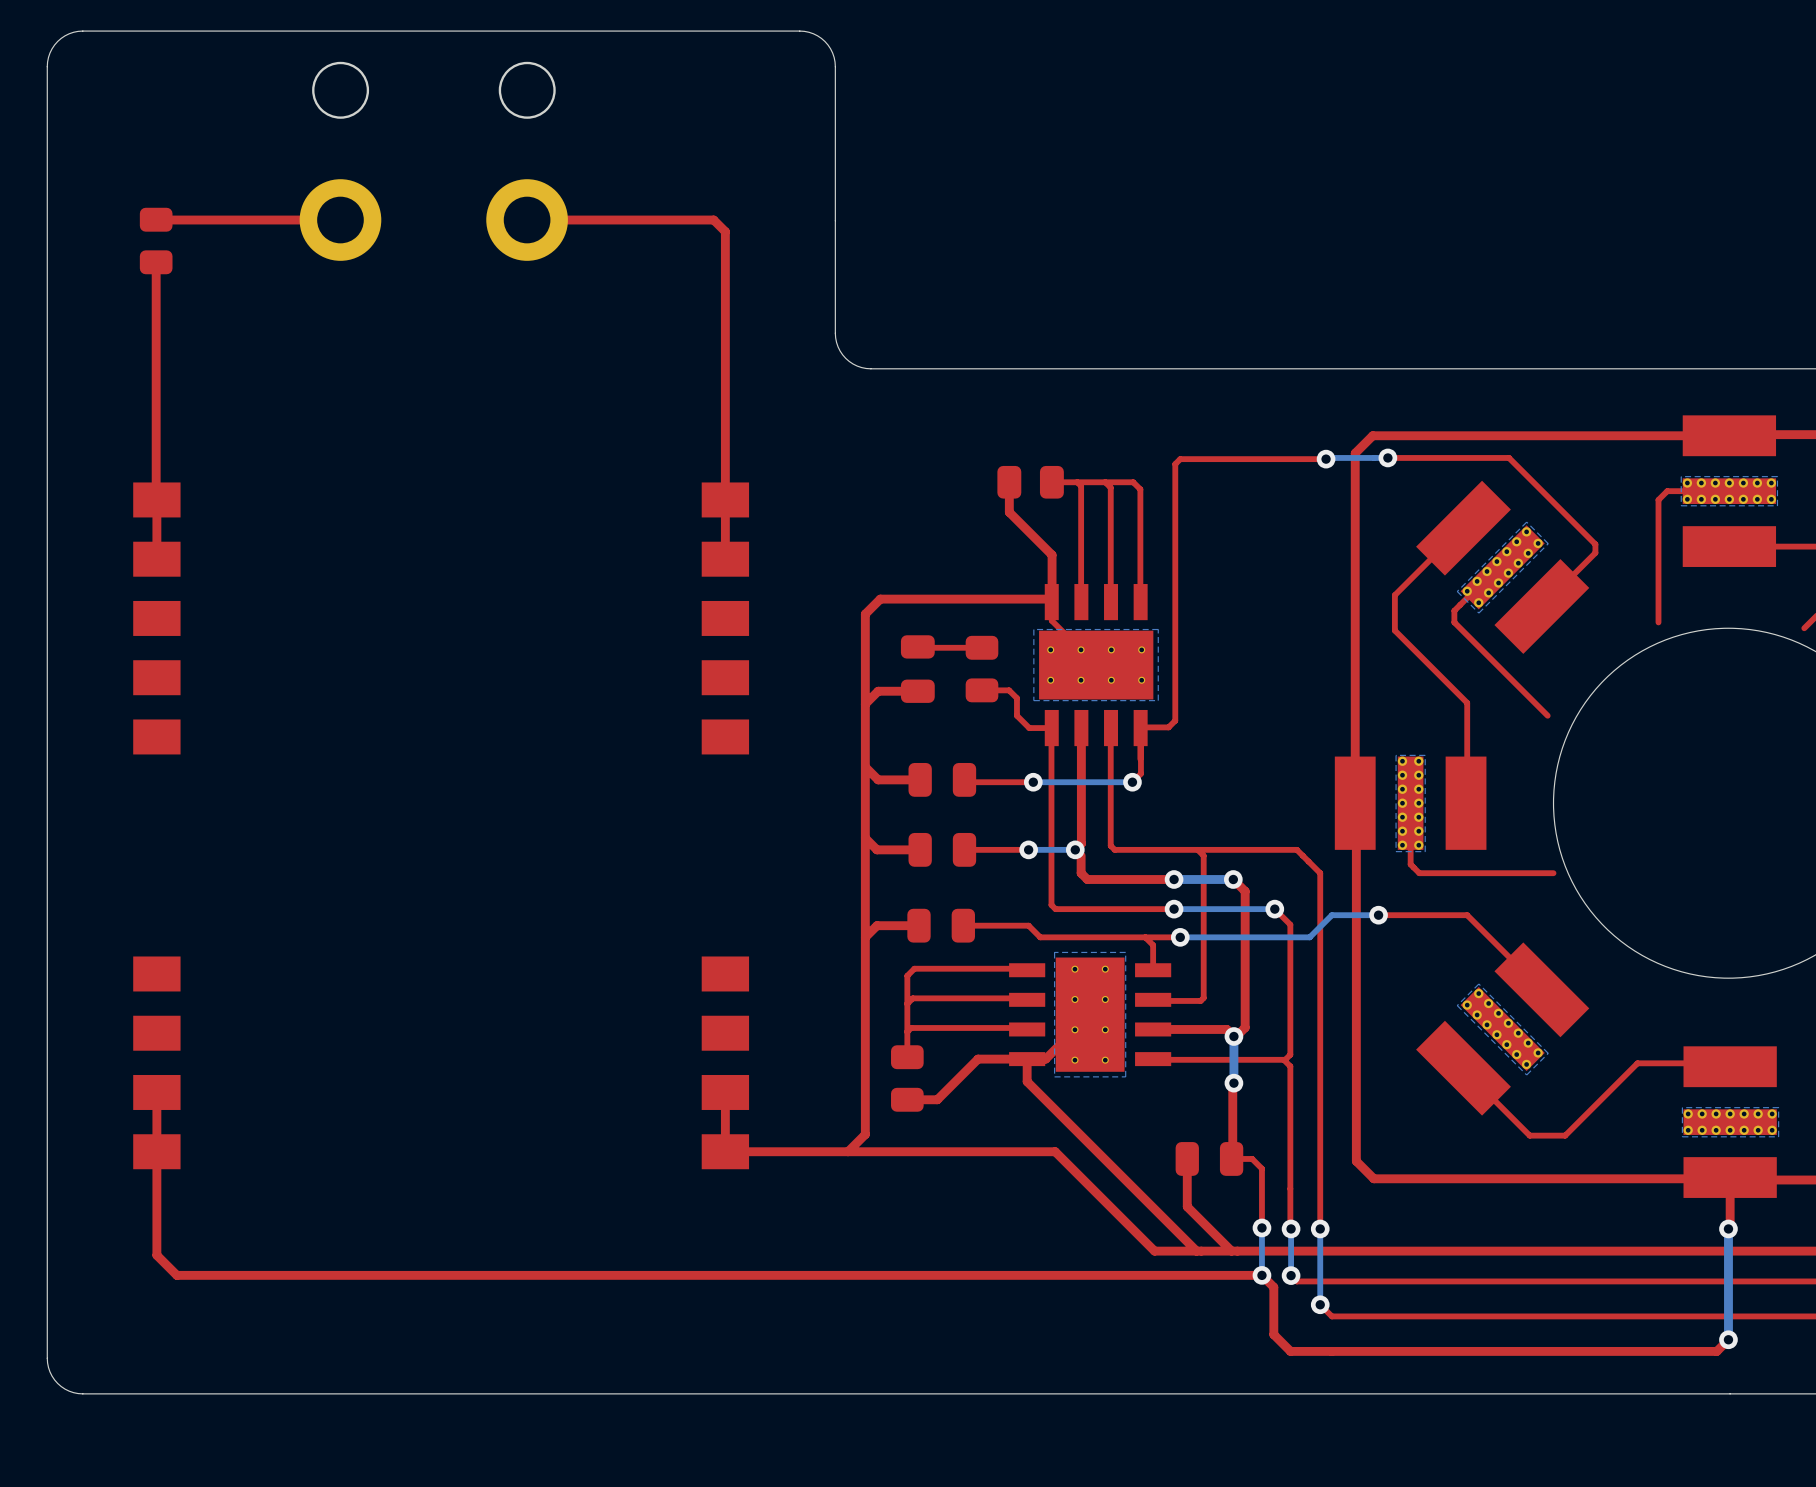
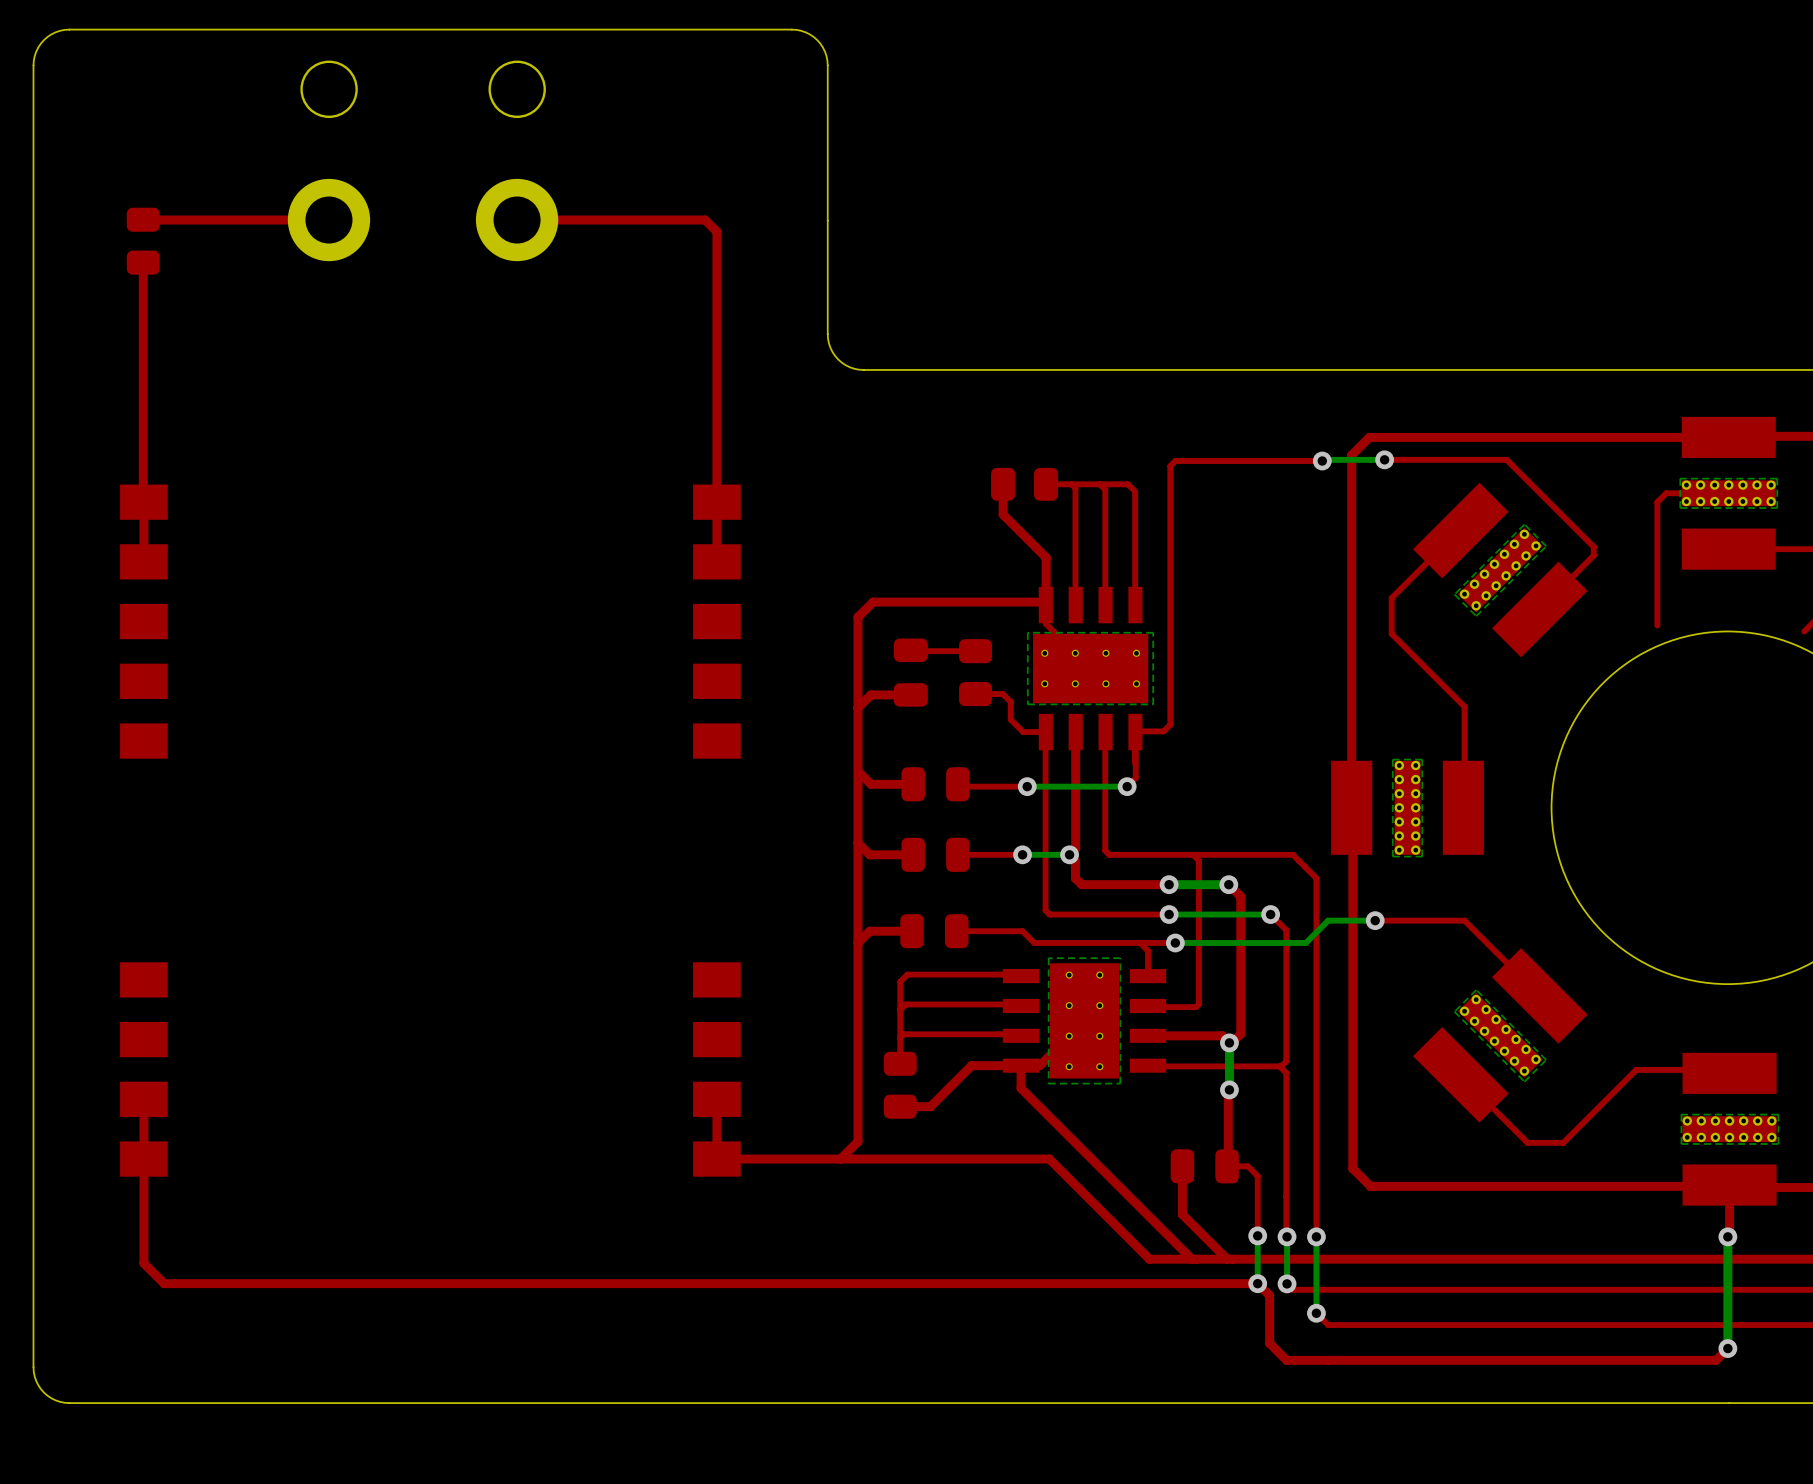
top track: (1502, 567) (1497, 567) (1454, 610) (1454, 622) (1547, 715) -> none
top track: (1410, 803) (1410, 864) (1419, 873) (1553, 873) -> none

